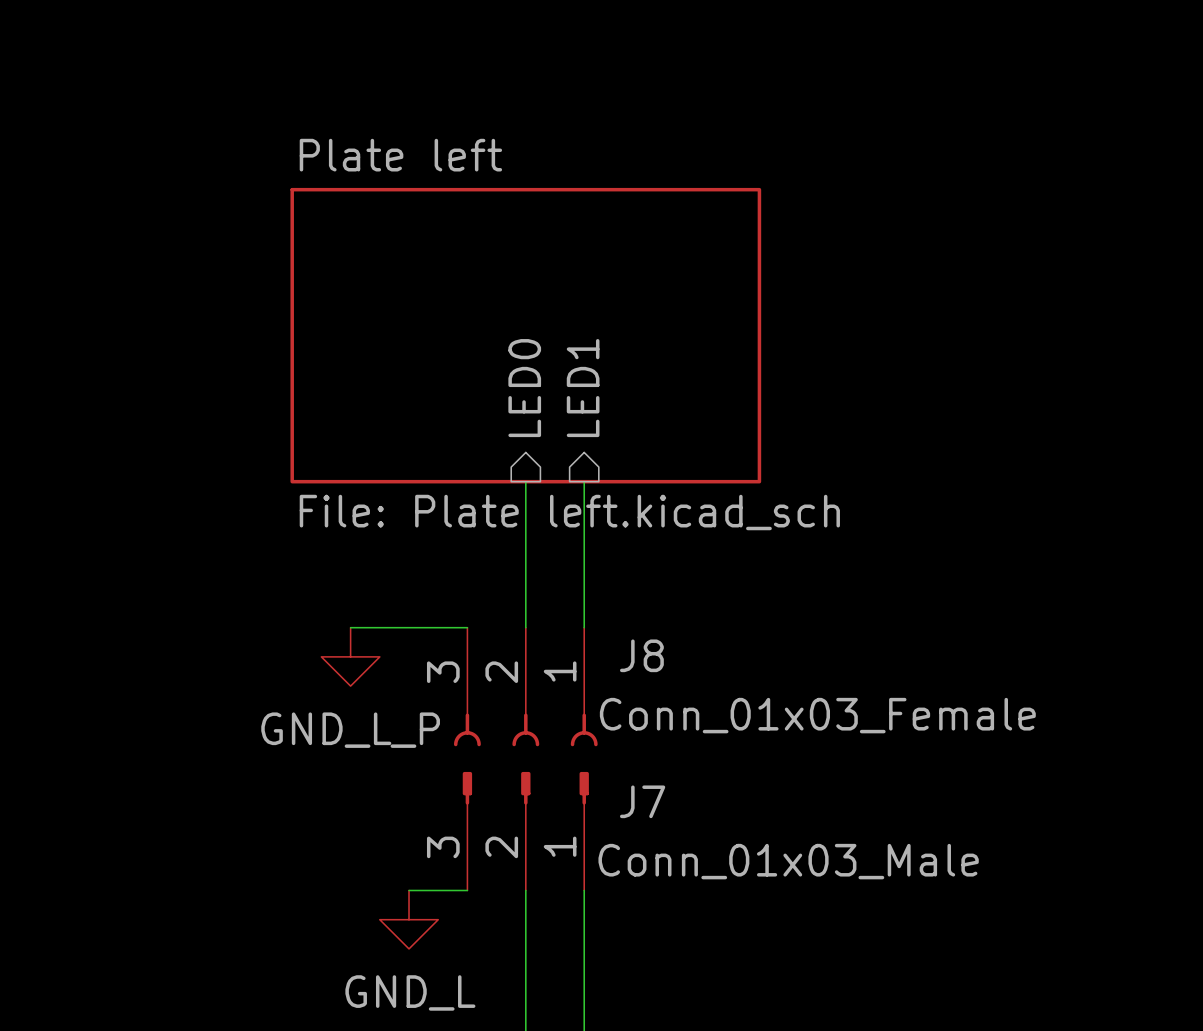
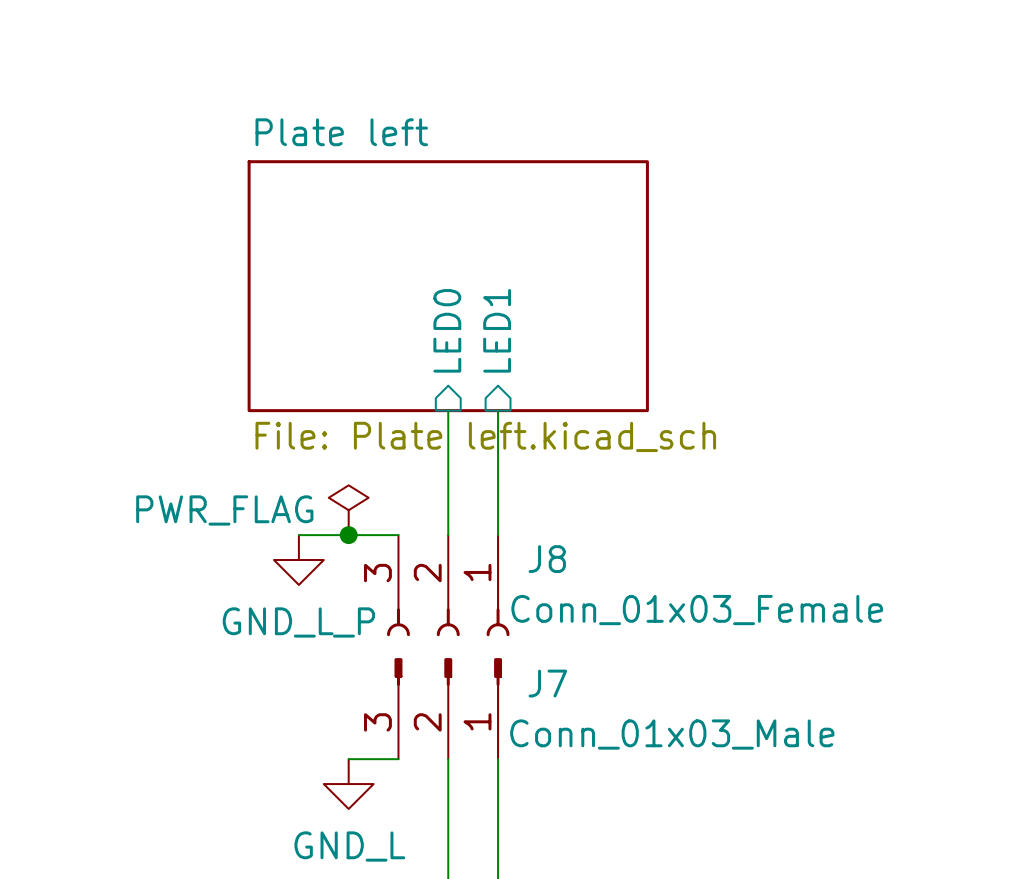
power symbol: none -> PWR_FLAG (348, 510)
junction: none -> (348, 535)

